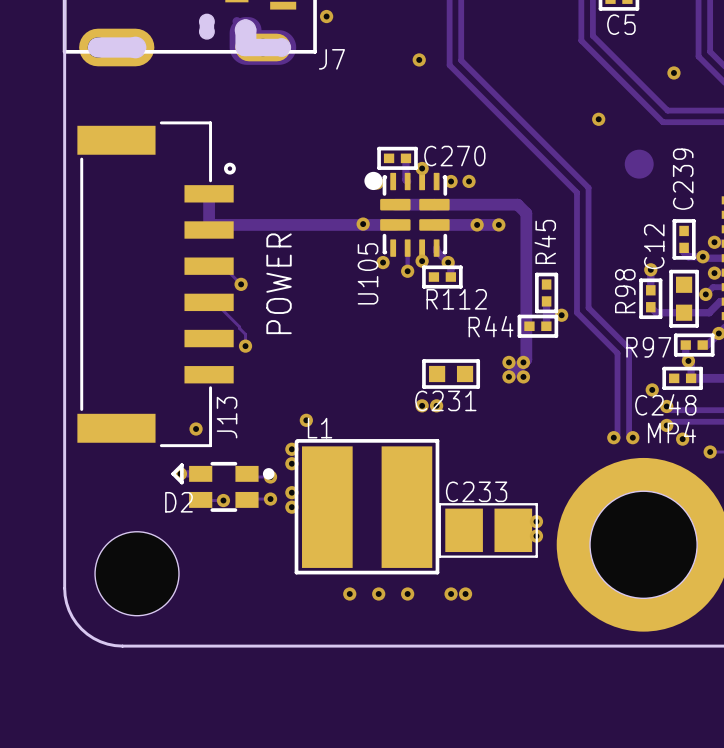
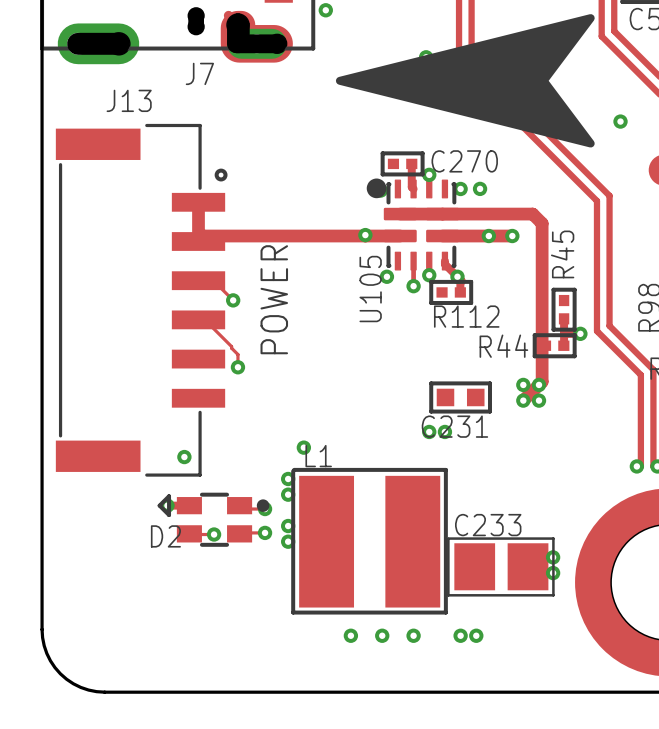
drawing: none -> [335, 14, 595, 148]
J7 name position: J7 (331, 59) -> J7 (199, 73)
J13 name rotation: 0° (227, 417) -> 90° clockwise (129, 100)
J13 name position: J13 (227, 417) -> J13 (129, 100)
part: (137, 573) -> none

